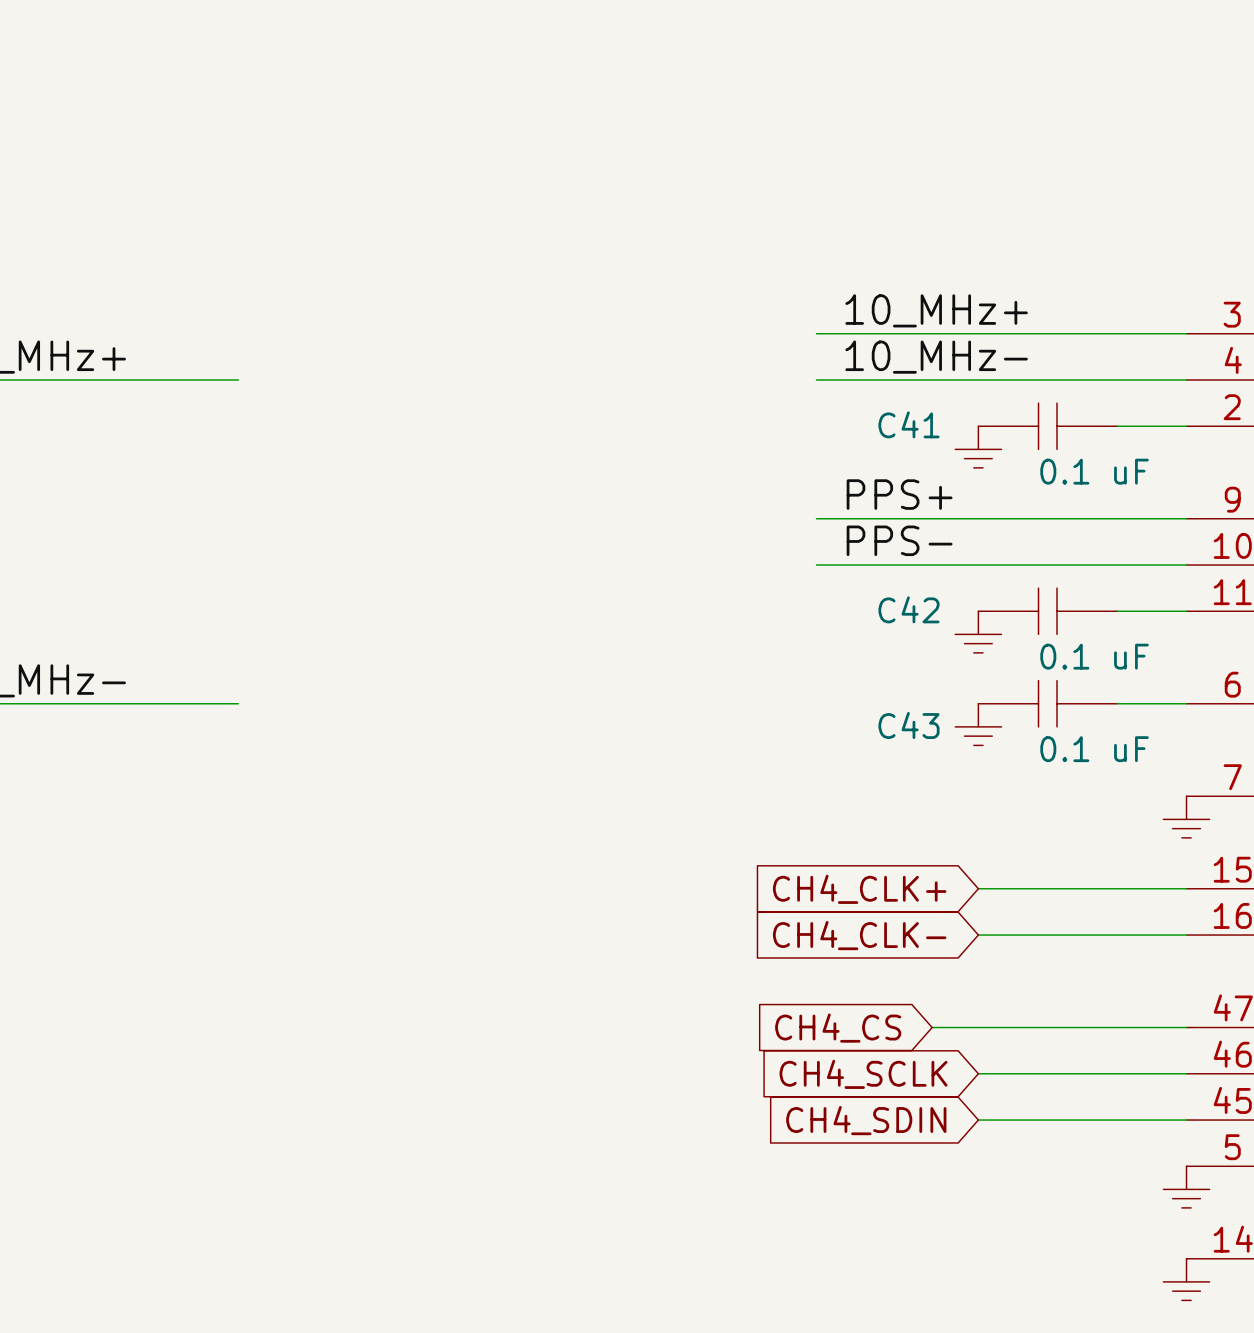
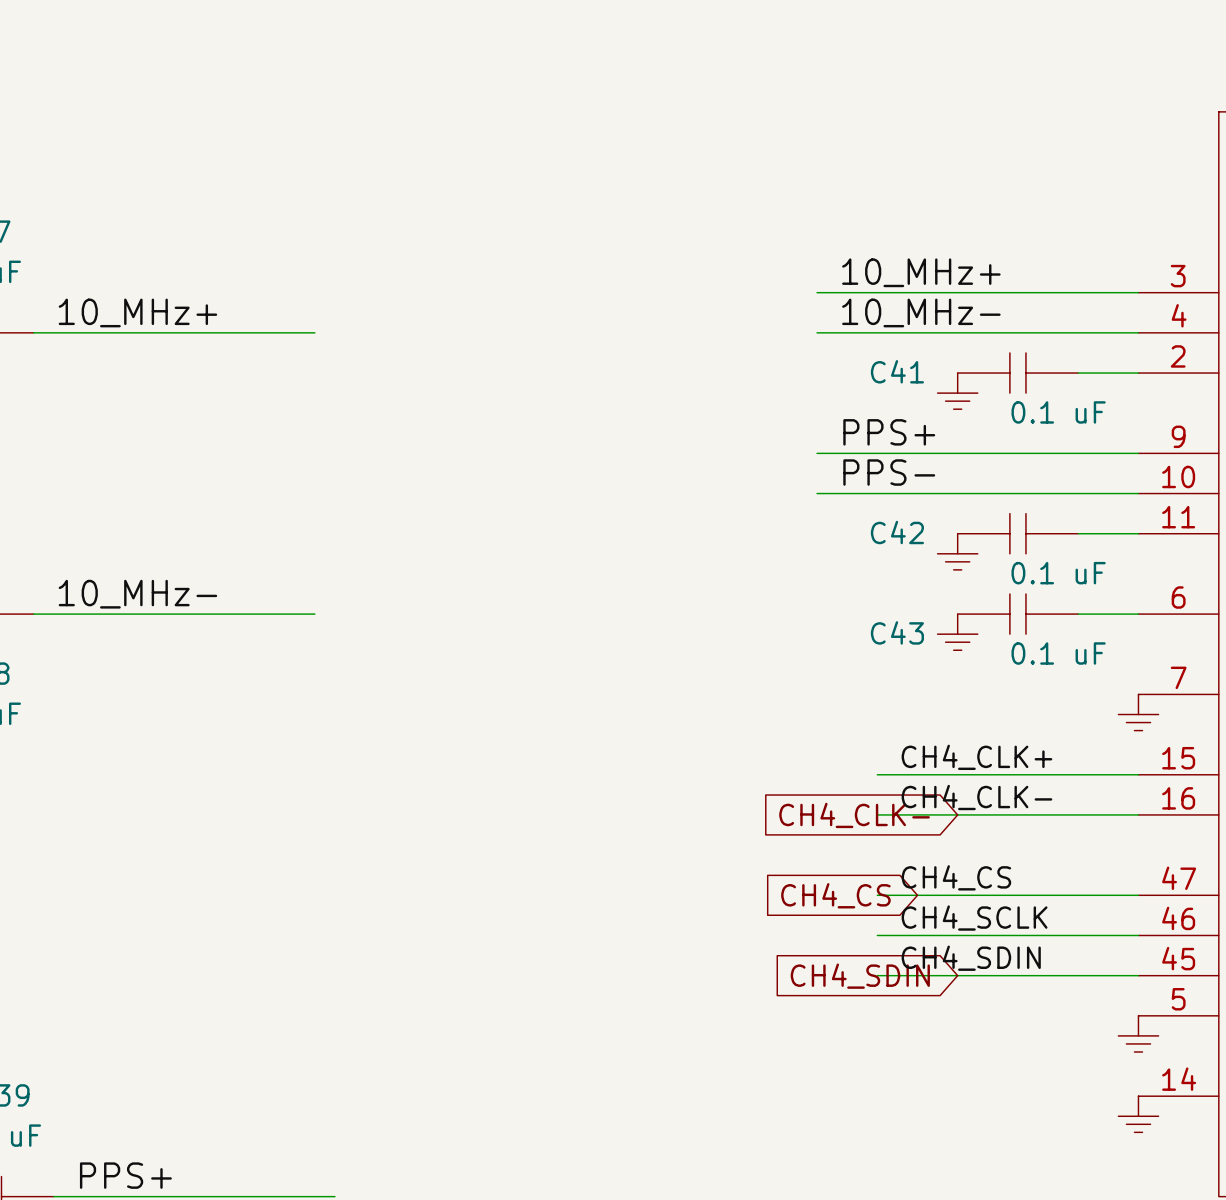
label: none -> CH4_CLK+ (976, 757)
wire: none -> (877, 774) (957, 774)
global label: CH4_CLK+ (859, 889) -> none
label: none -> CH4_CLK- (976, 797)
wire: none -> (877, 814) (957, 814)
label: none -> CH4_CS (956, 877)
wire: none -> (877, 895) (917, 895)
label: none -> CH4_SCLK (974, 918)
wire: none -> (877, 935) (957, 935)
global label: CH4_SCLK (863, 1074) -> none
label: none -> CH4_SDIN (971, 958)
wire: none -> (877, 975) (957, 975)

